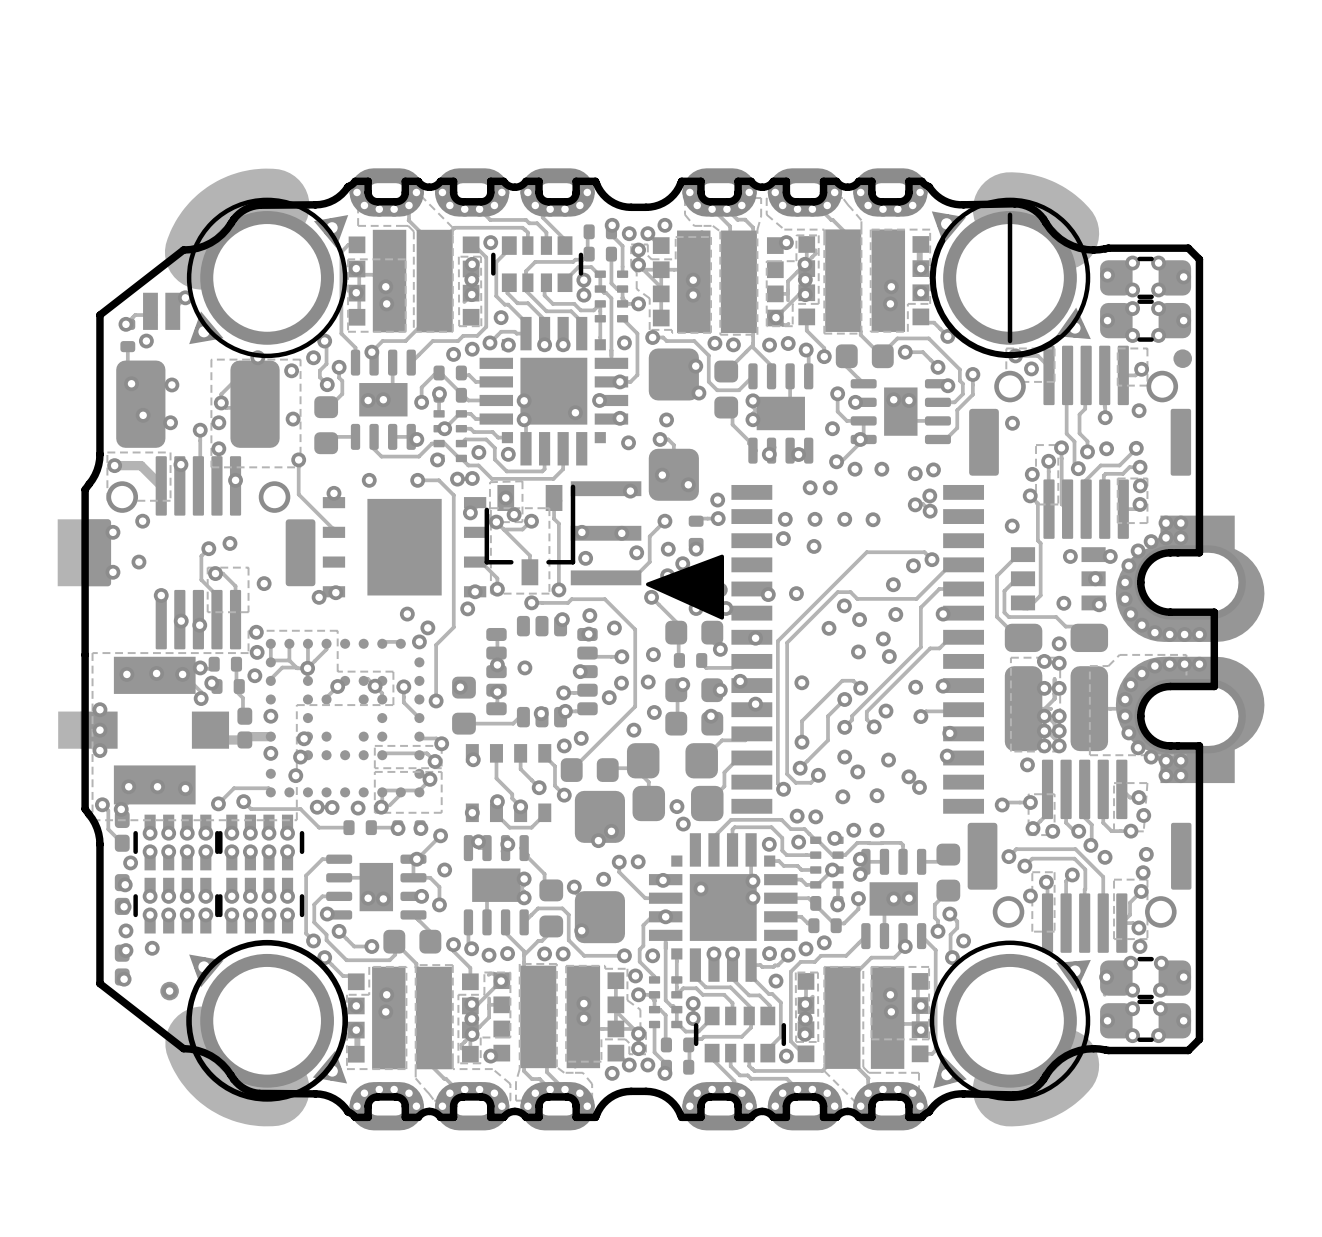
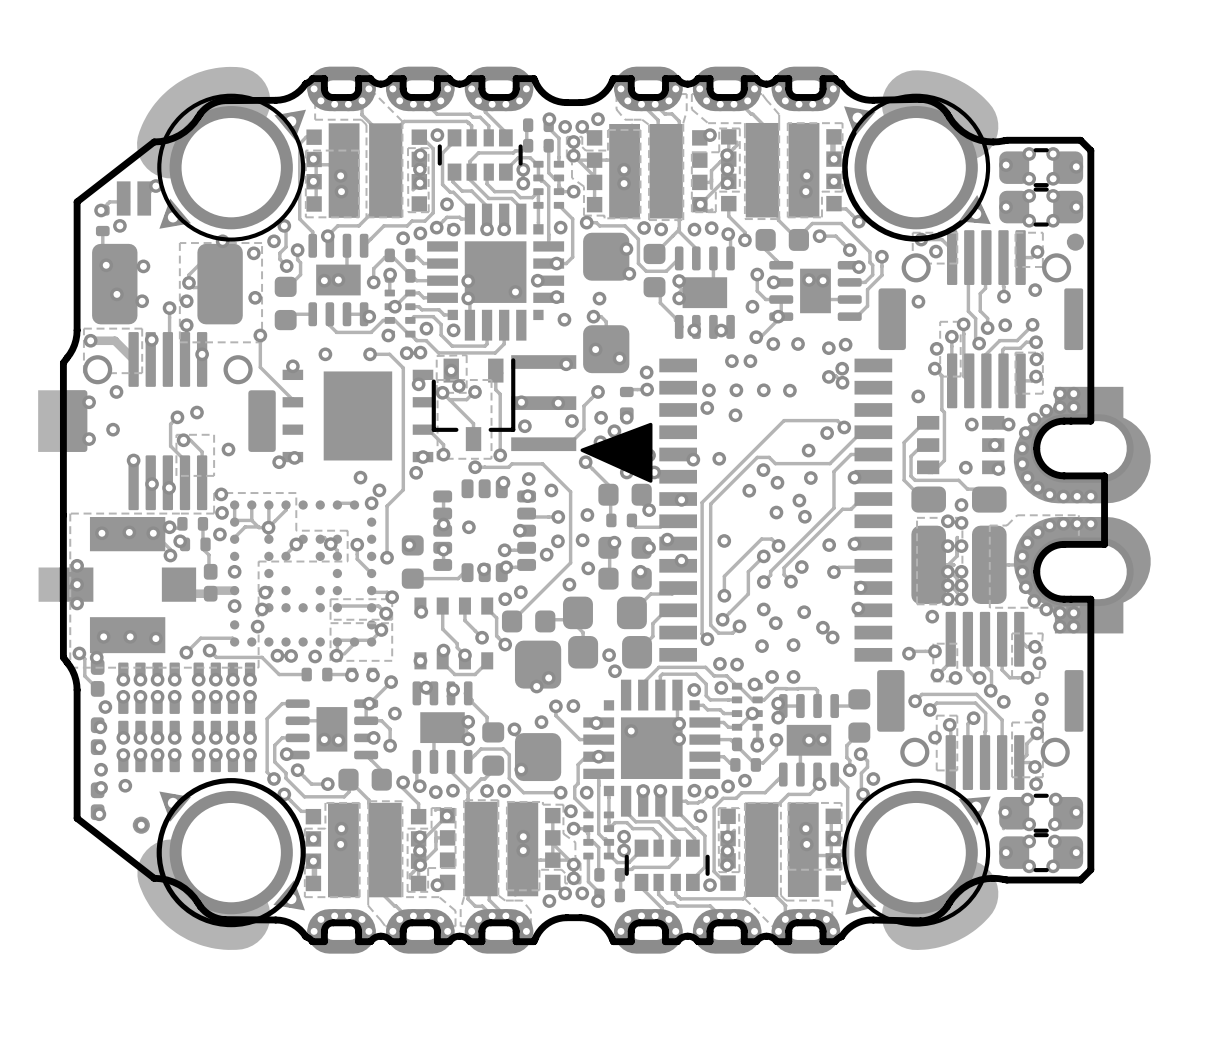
line: (1010, 214) (1010, 341) -> none
part footprint: [133, 814, 223, 871] -> [118, 662, 180, 714]
part footprint: [215, 814, 305, 871] -> [193, 662, 256, 714]
part footprint: [133, 877, 223, 934] -> [118, 720, 180, 773]
part footprint: [215, 877, 305, 934] -> [193, 720, 256, 773]

